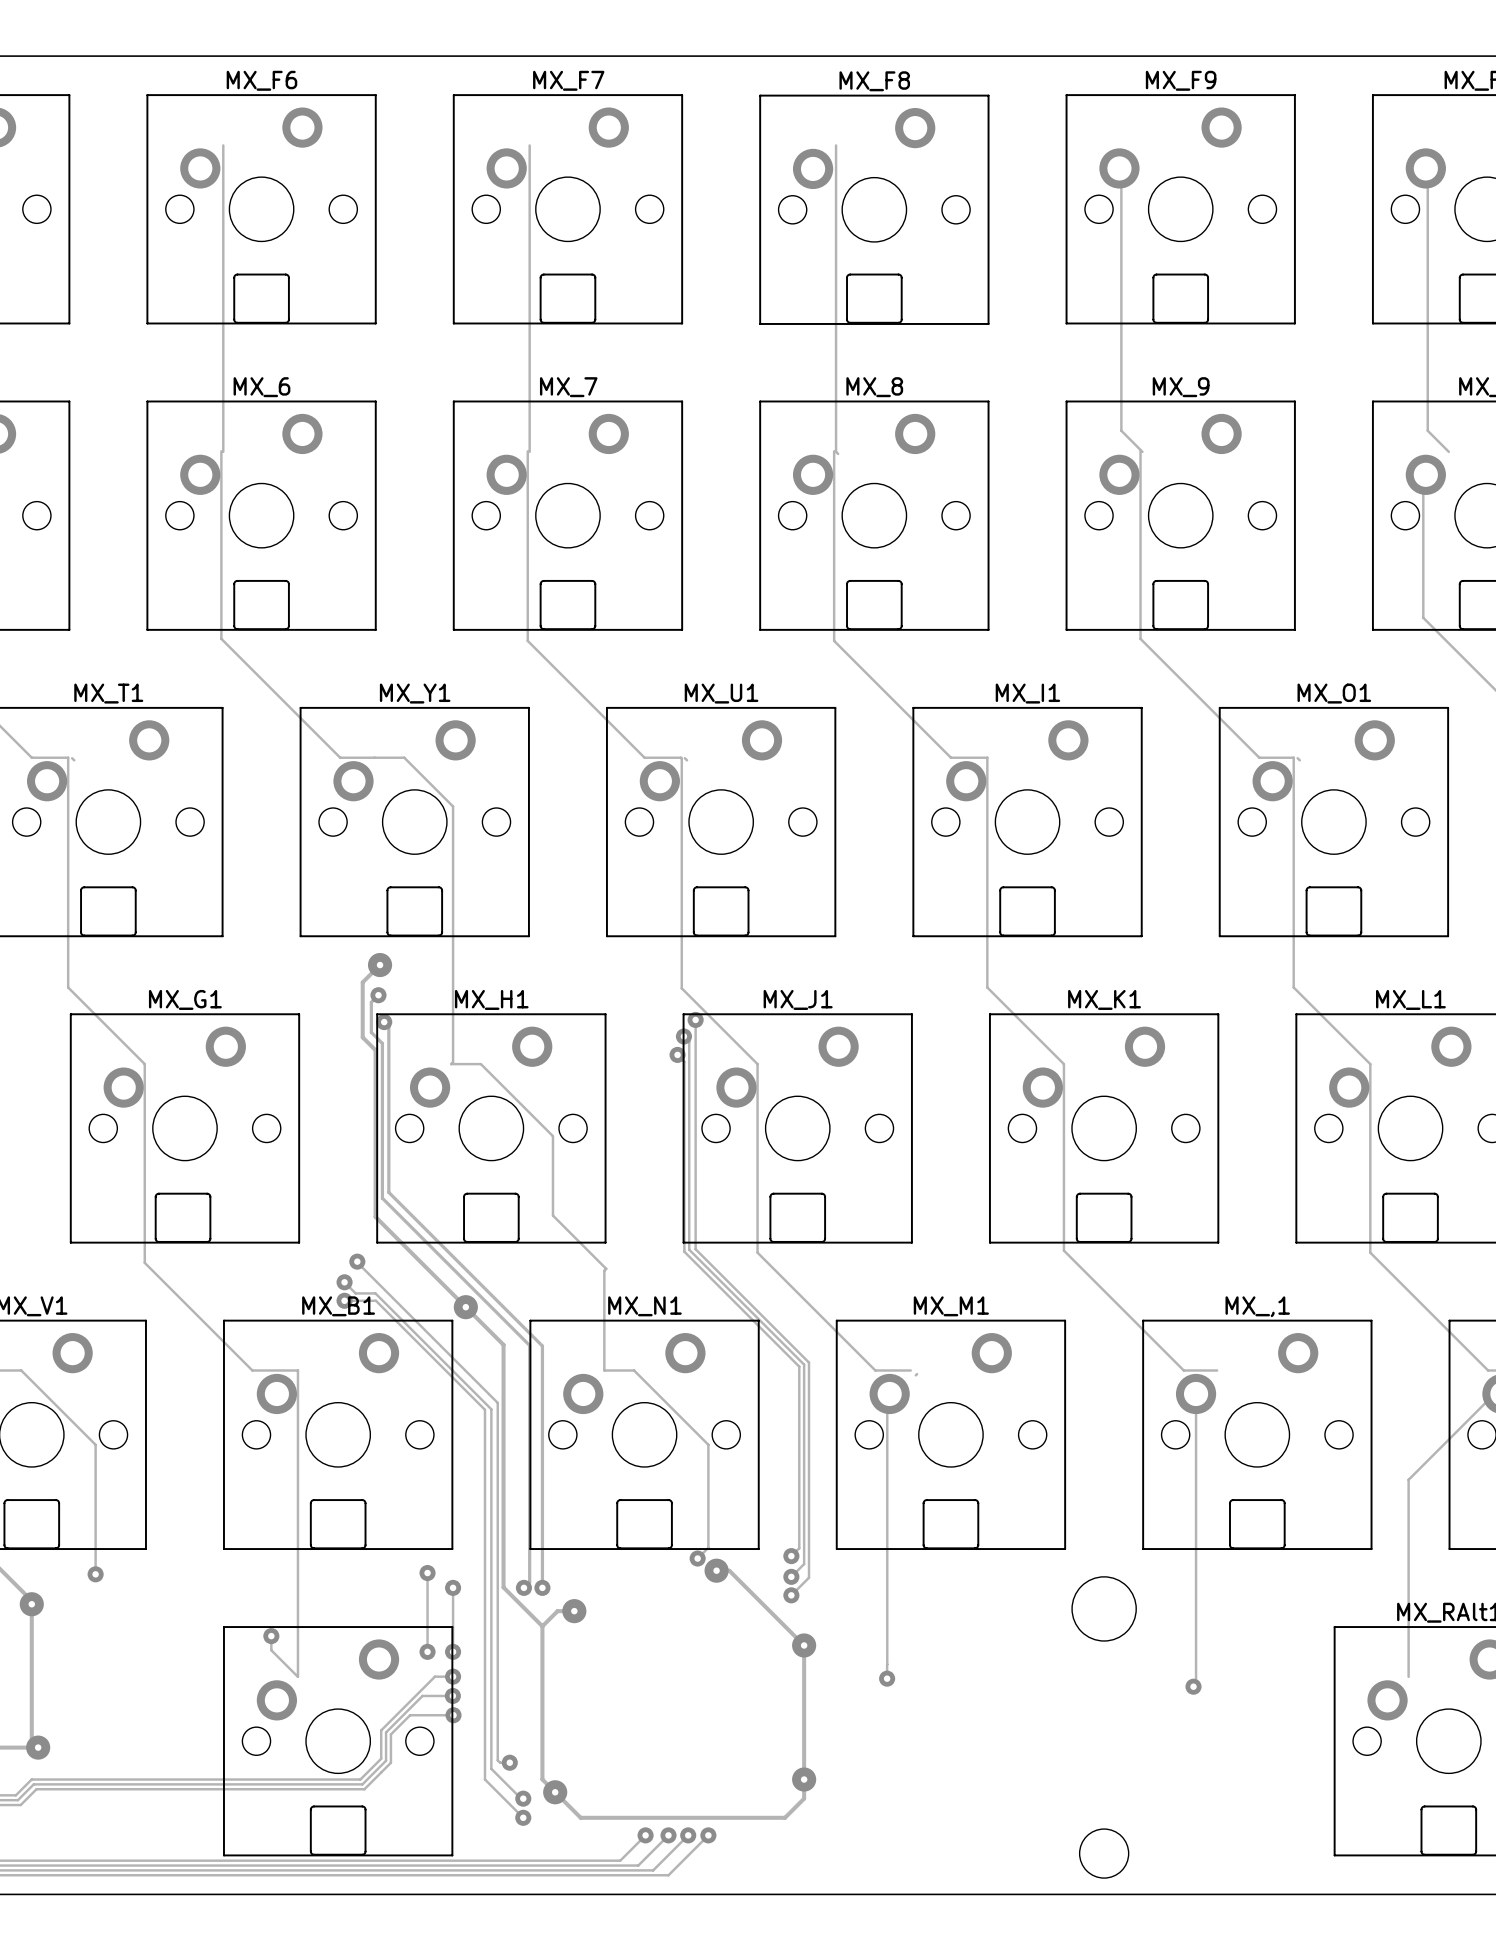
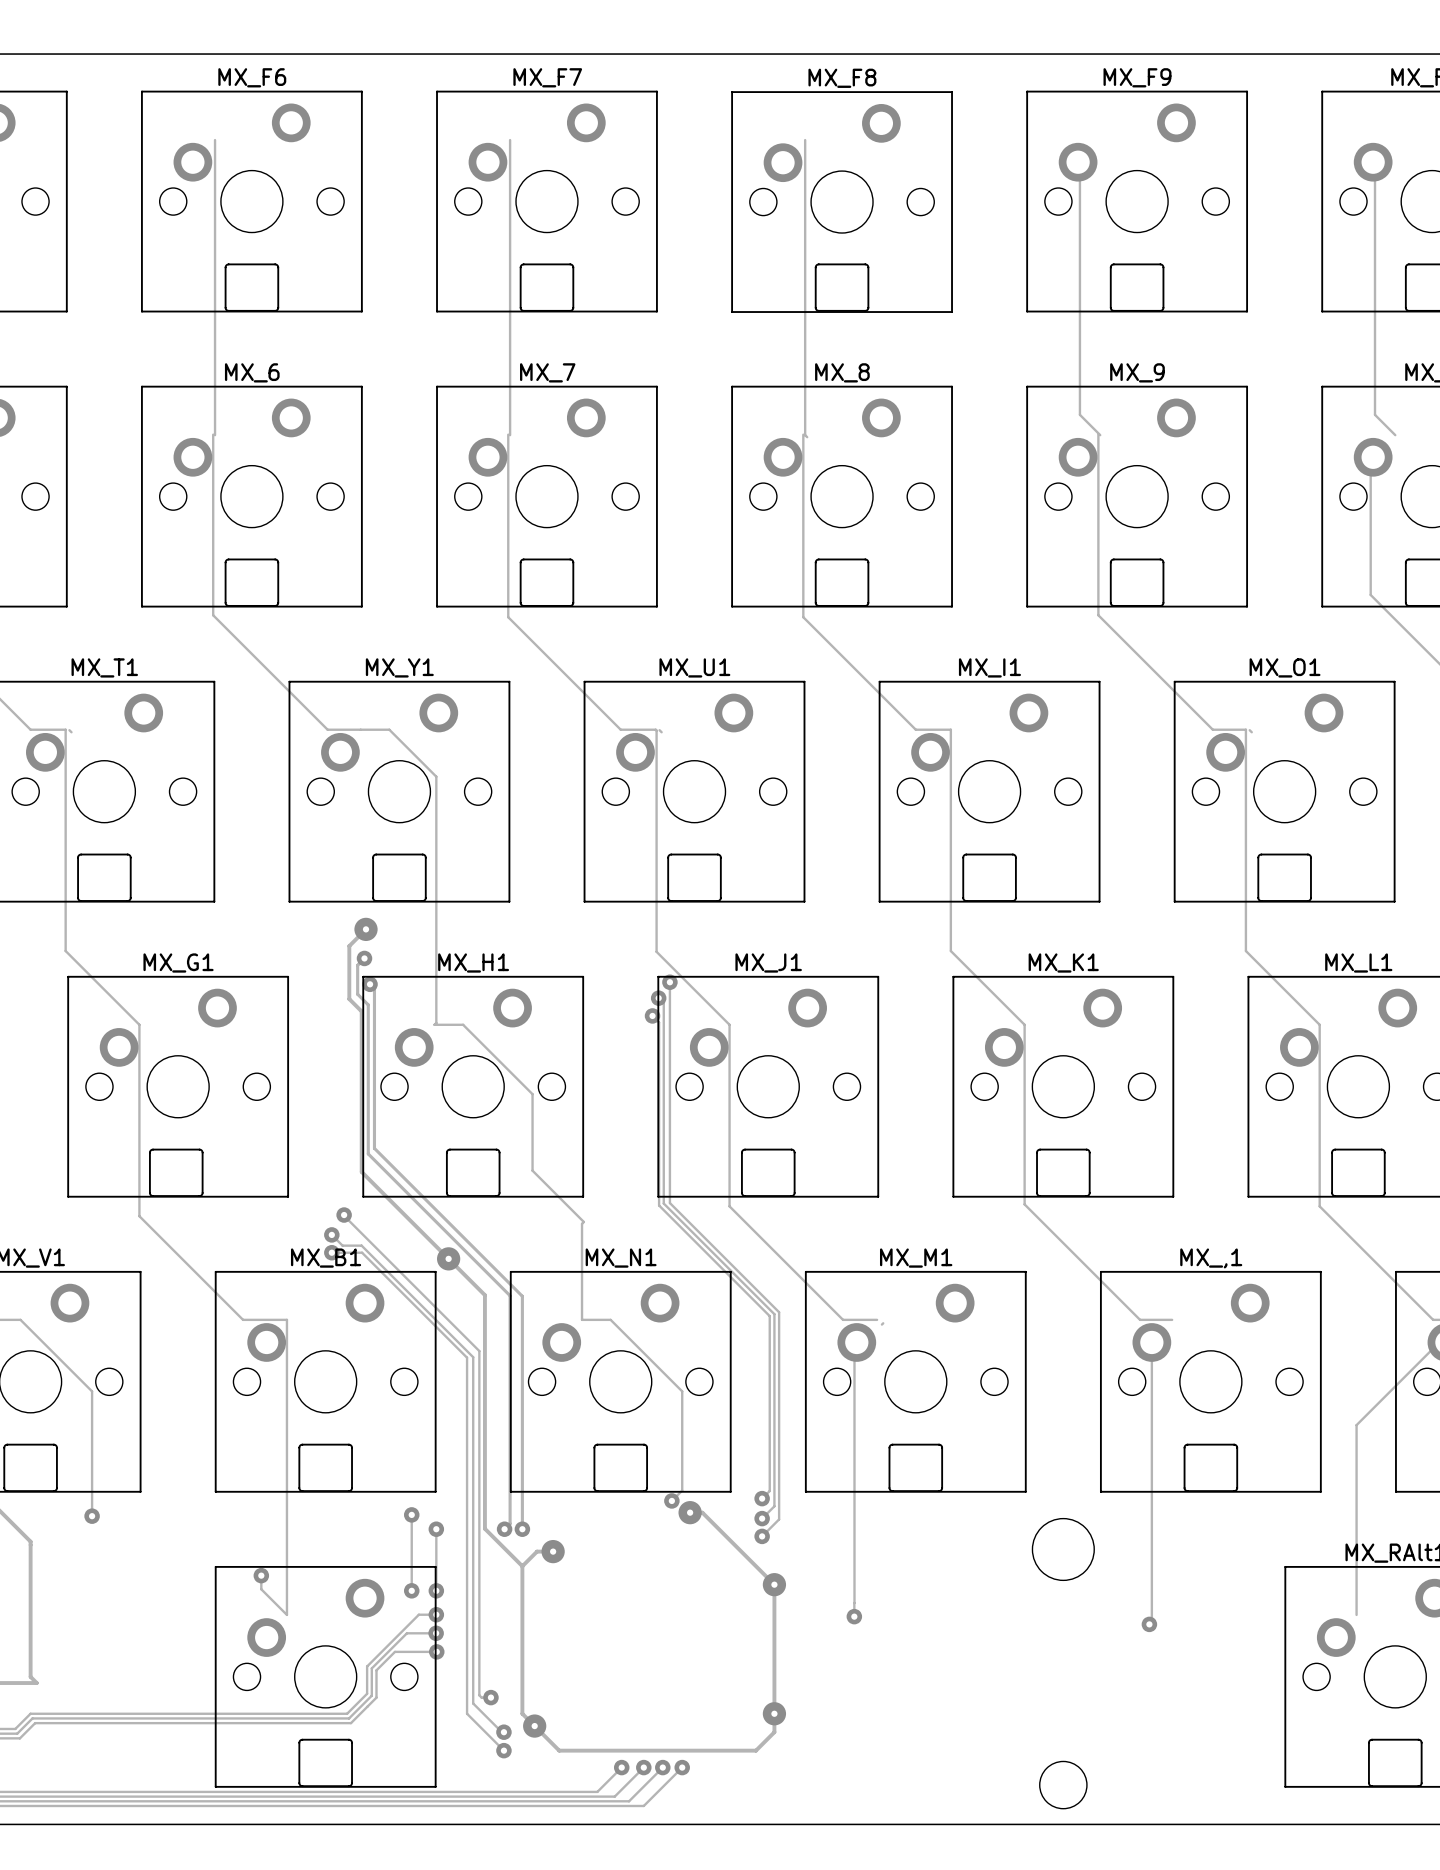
via: (31, 1604) -> none
via: (38, 1747) -> none

